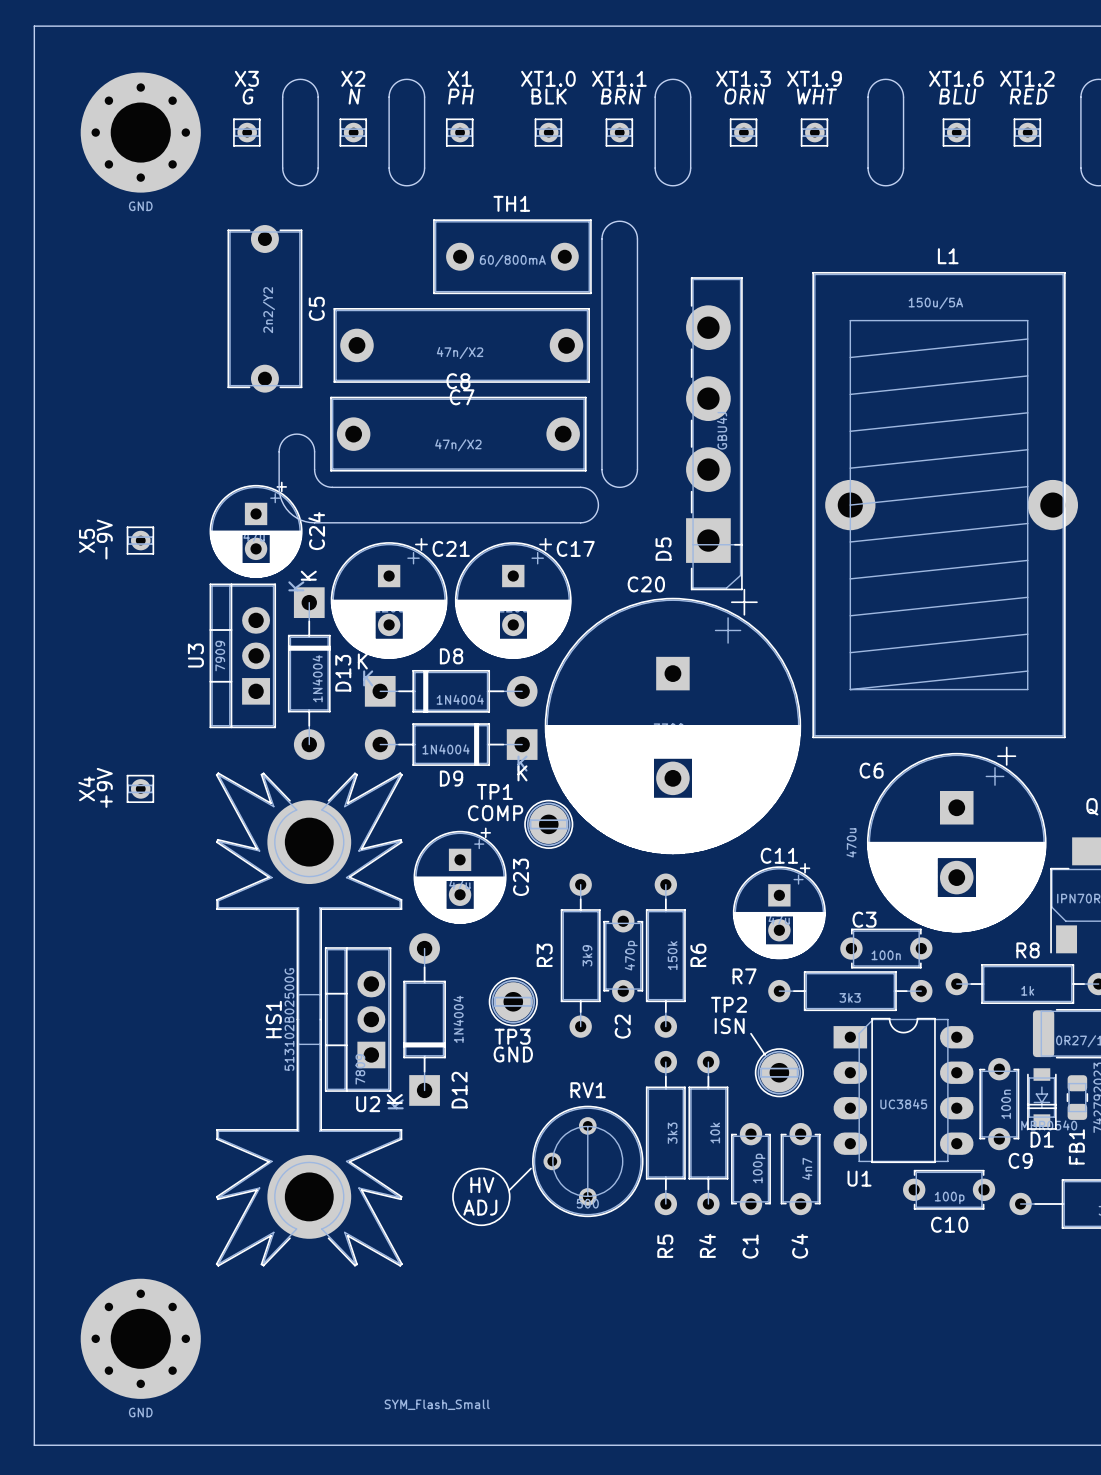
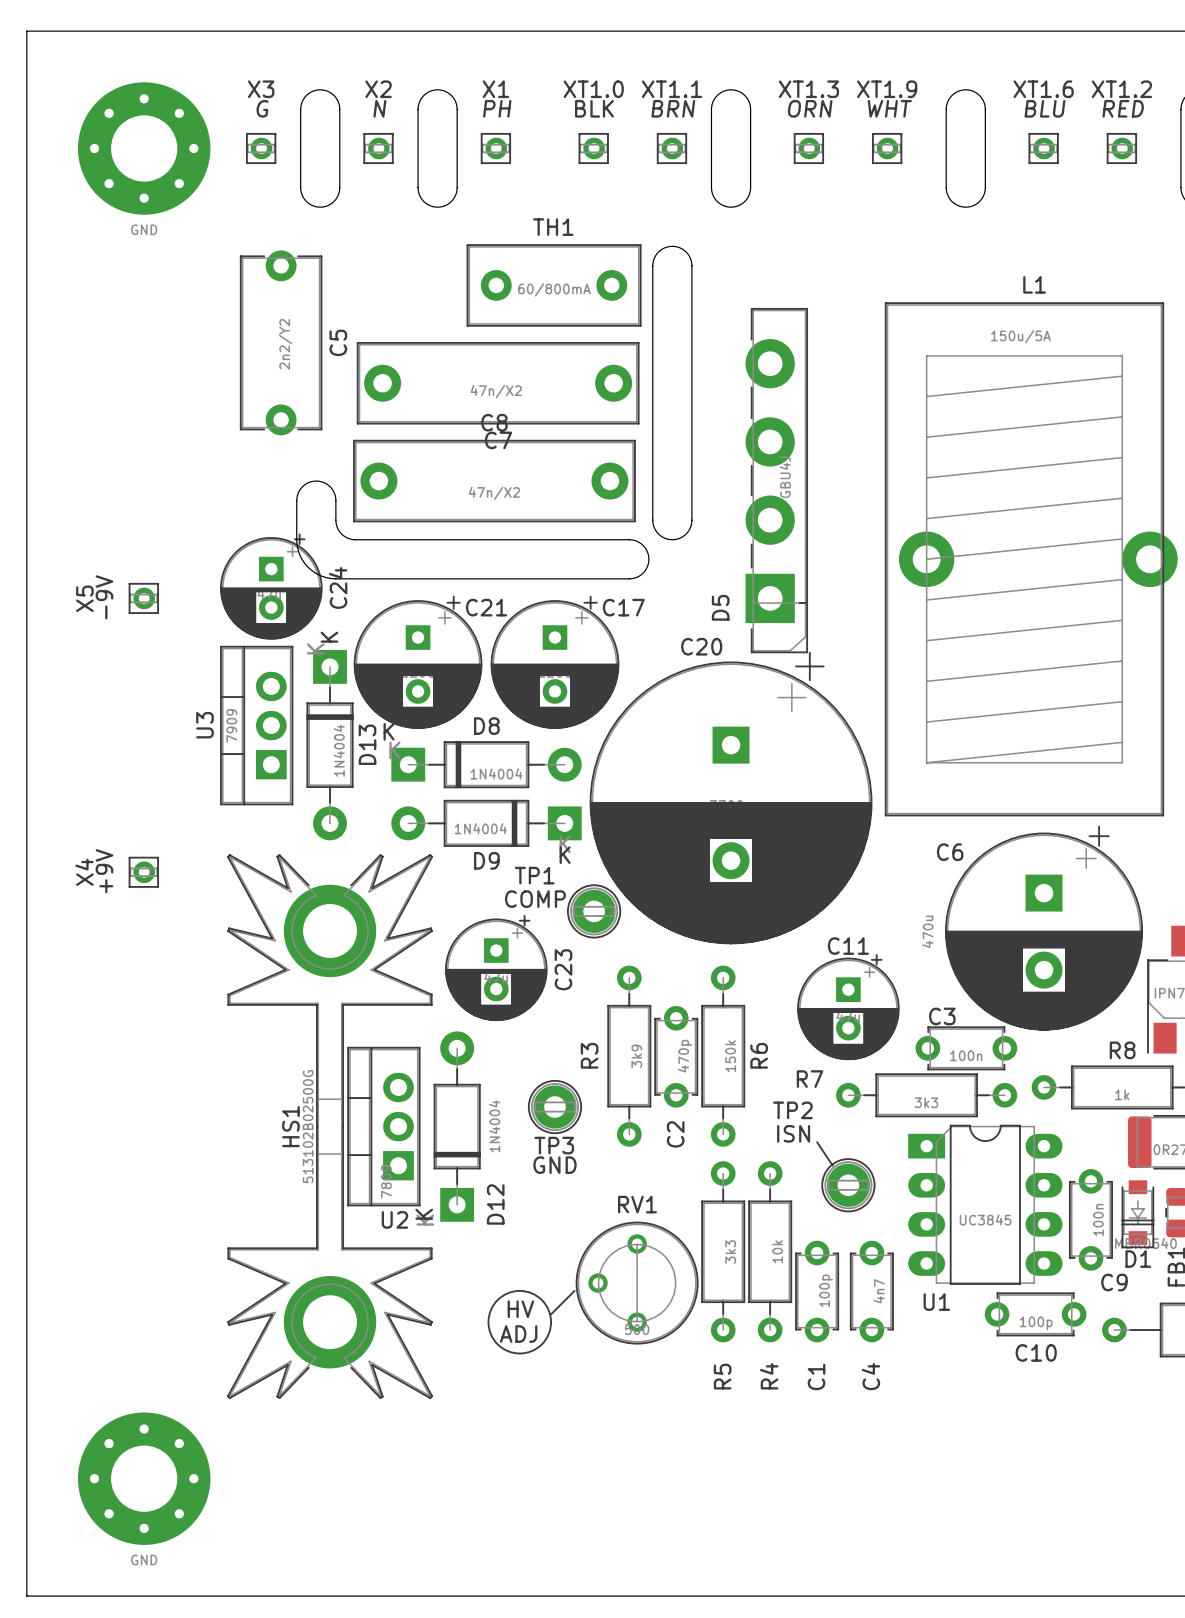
drawing: [384, 1399, 490, 1411] -> none

